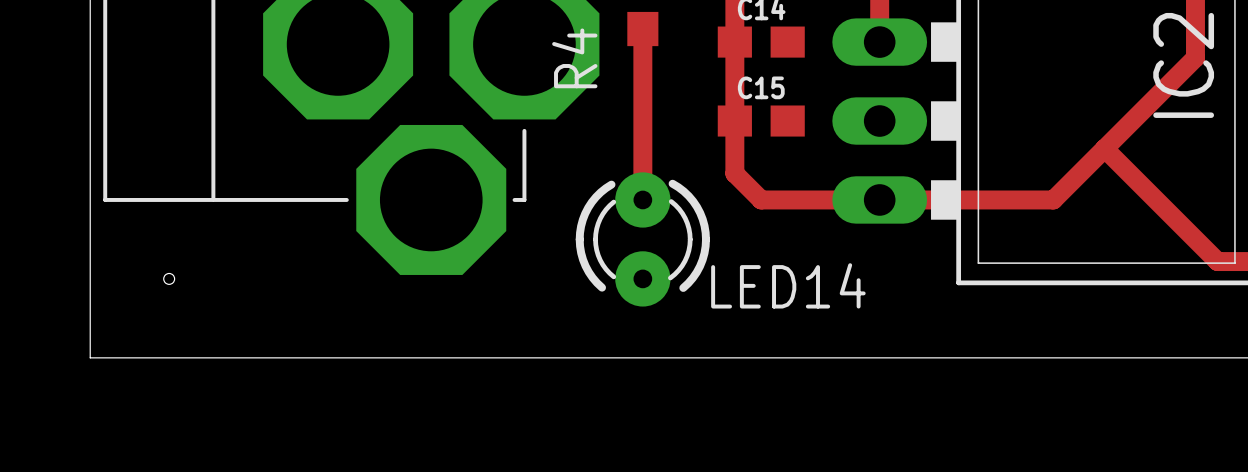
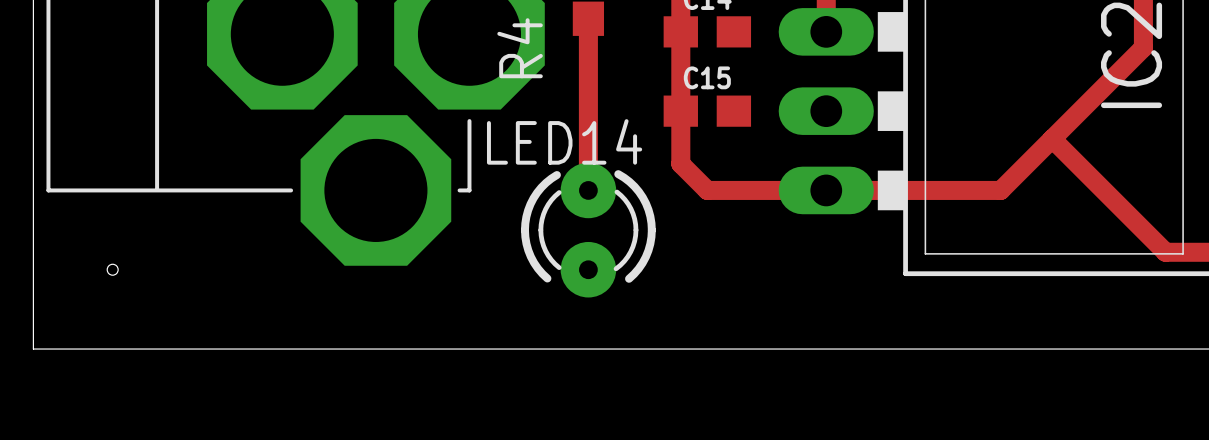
LED14 name position: LED14 (788, 285) -> LED14 (564, 141)

